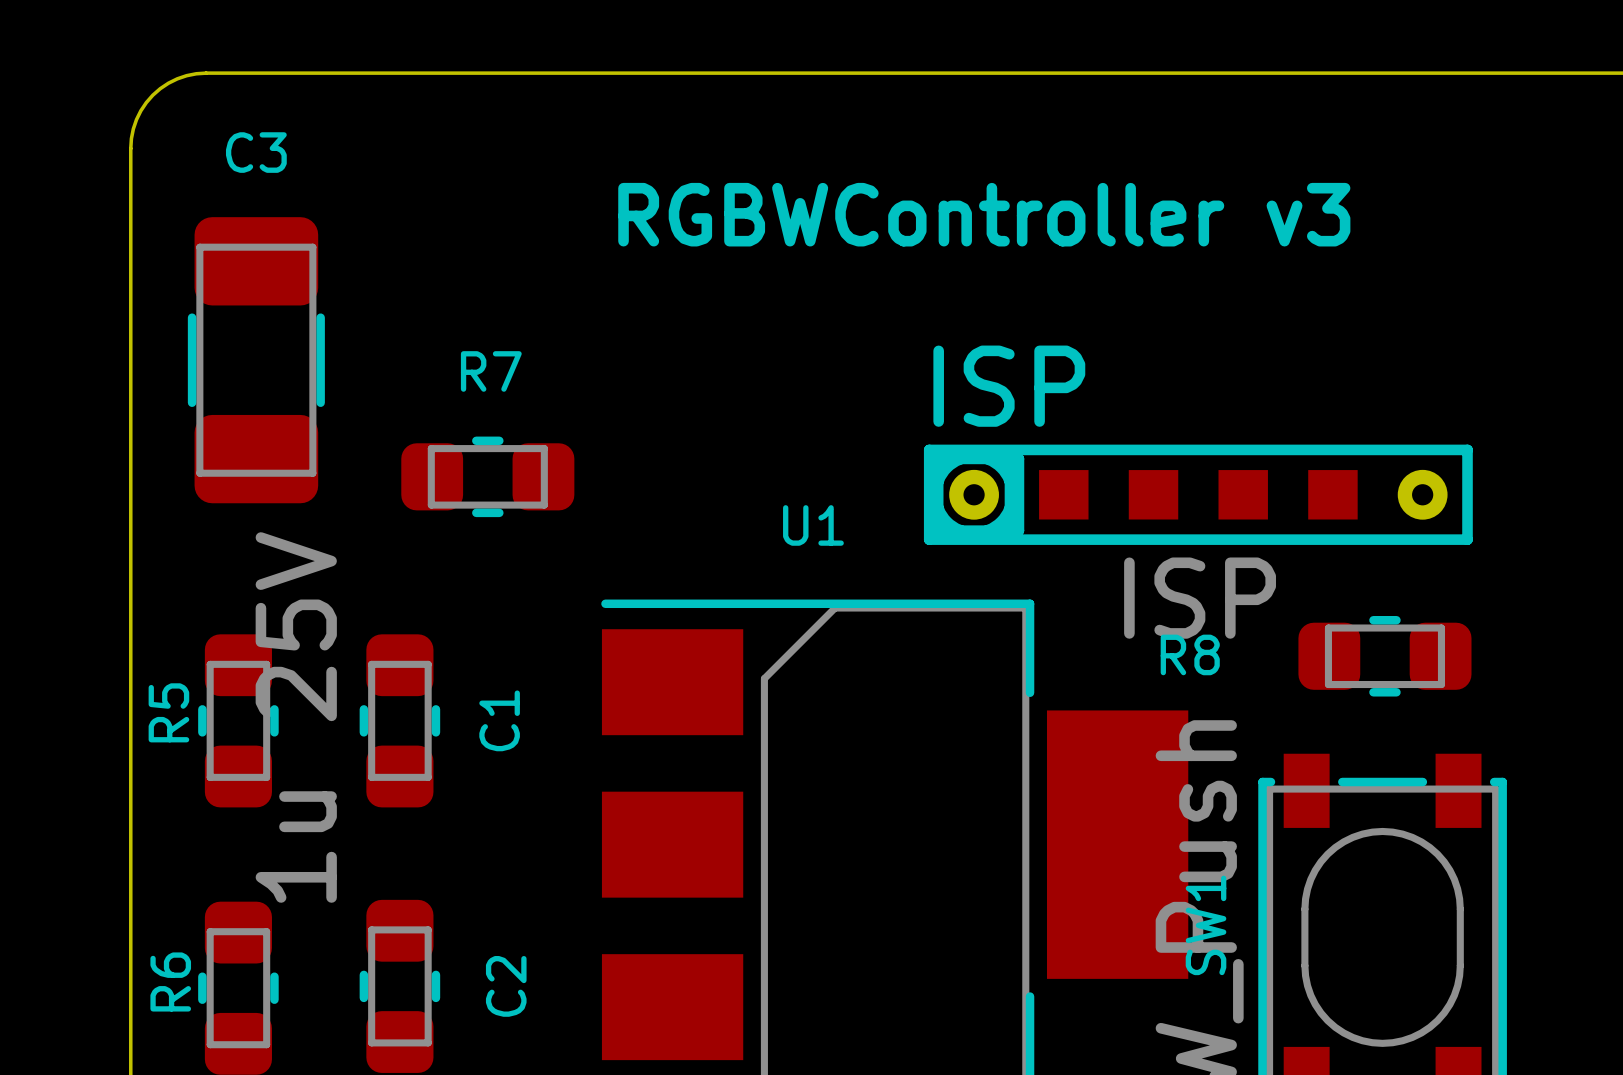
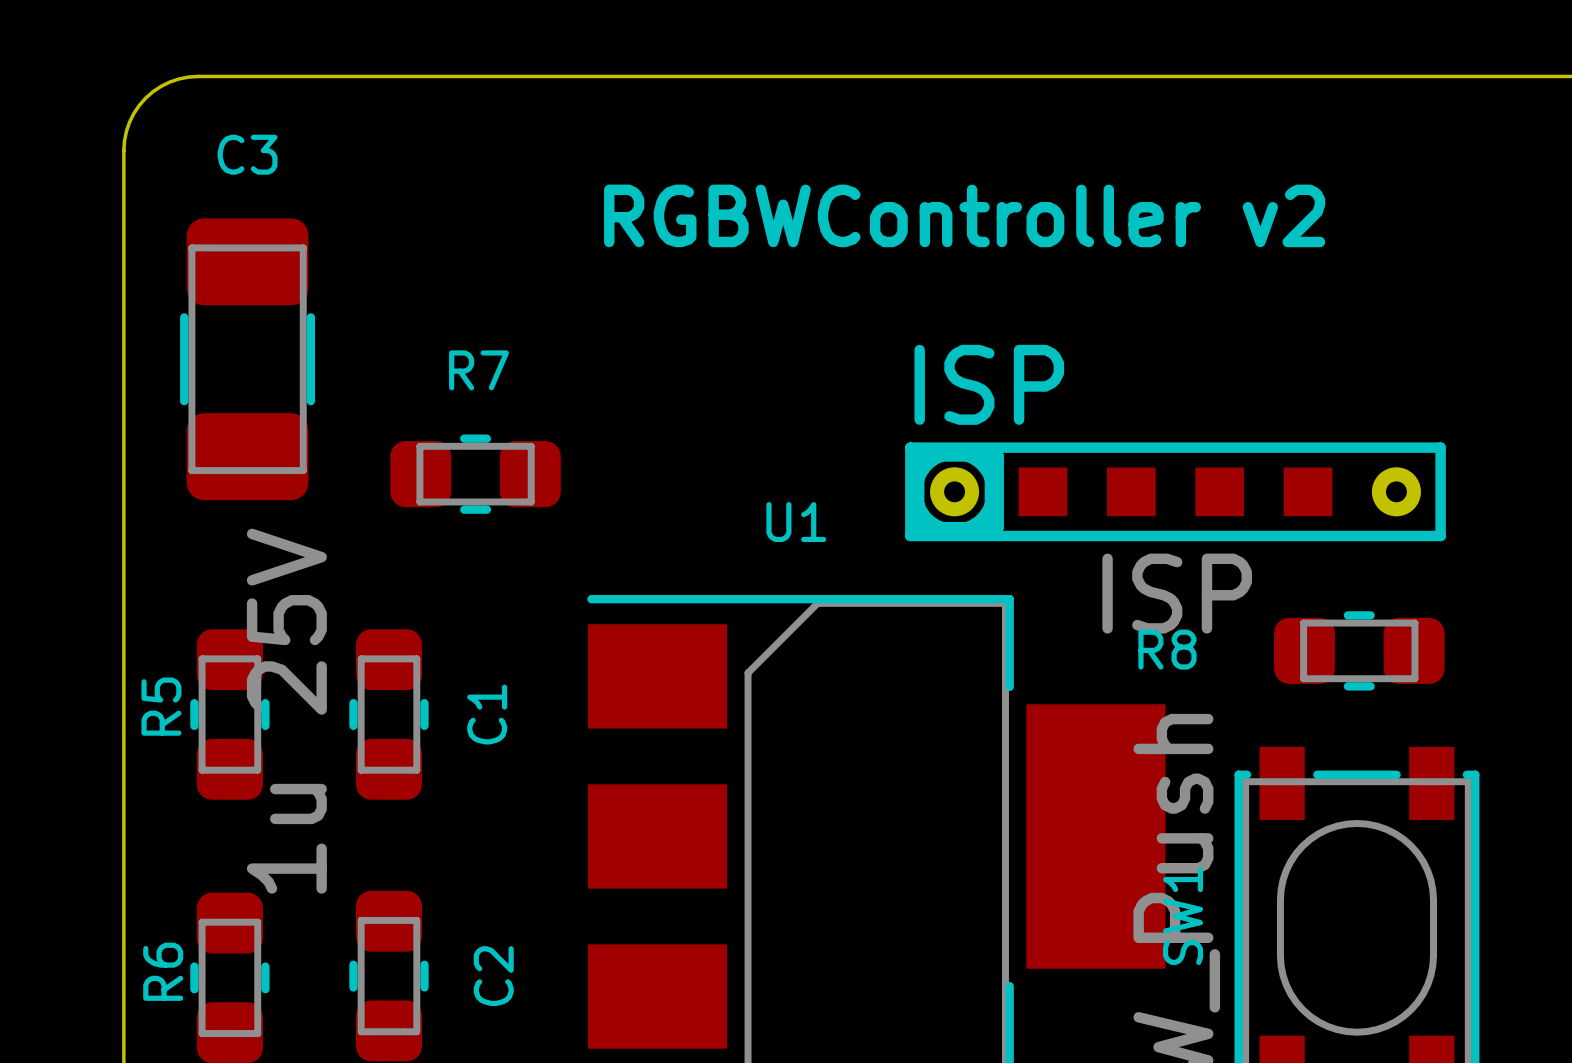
text: RGBWController v3 (984, 214) -> RGBWController v2 (964, 215)

